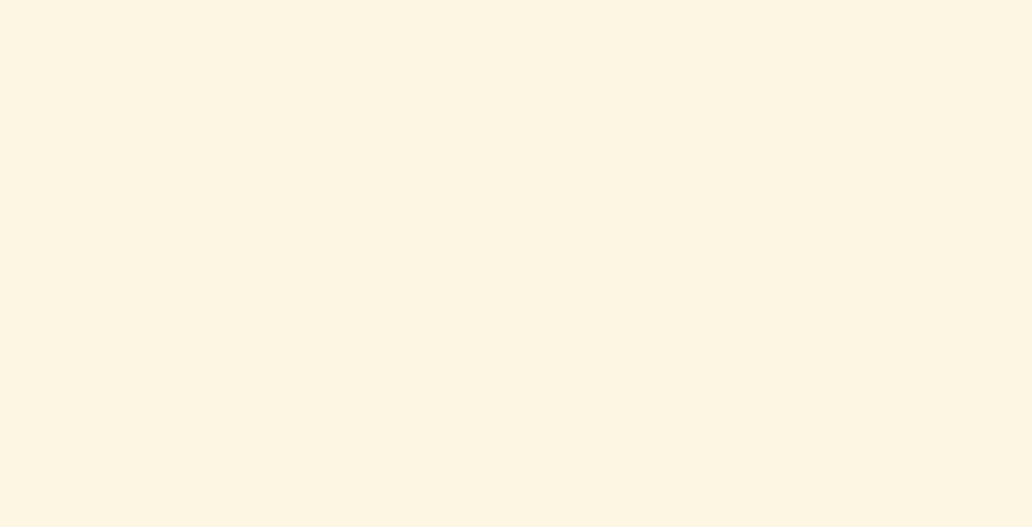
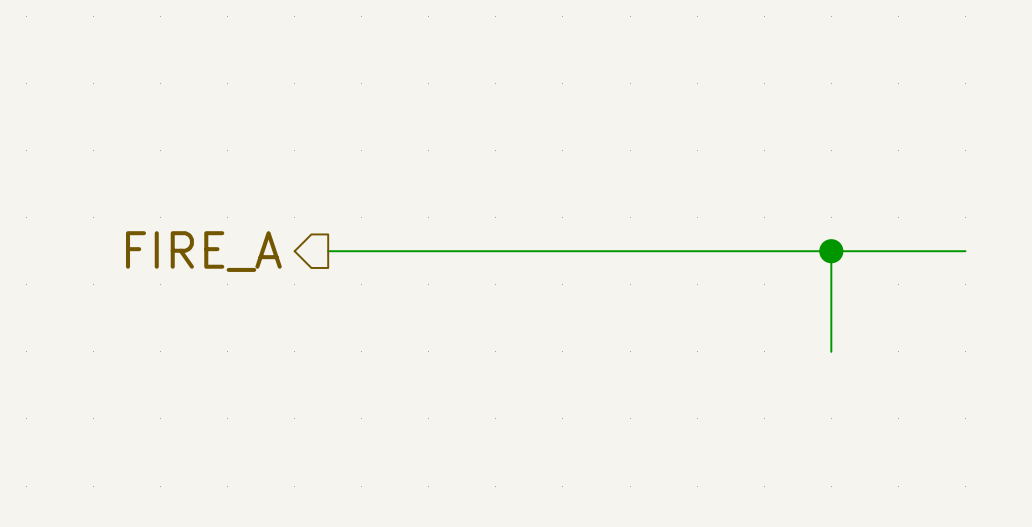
hierarchical label: none -> FIRE_A (203, 251)
wire: none -> (328, 251) (965, 251)
wire: none -> (831, 251) (831, 351)
junction: none -> (831, 251)

